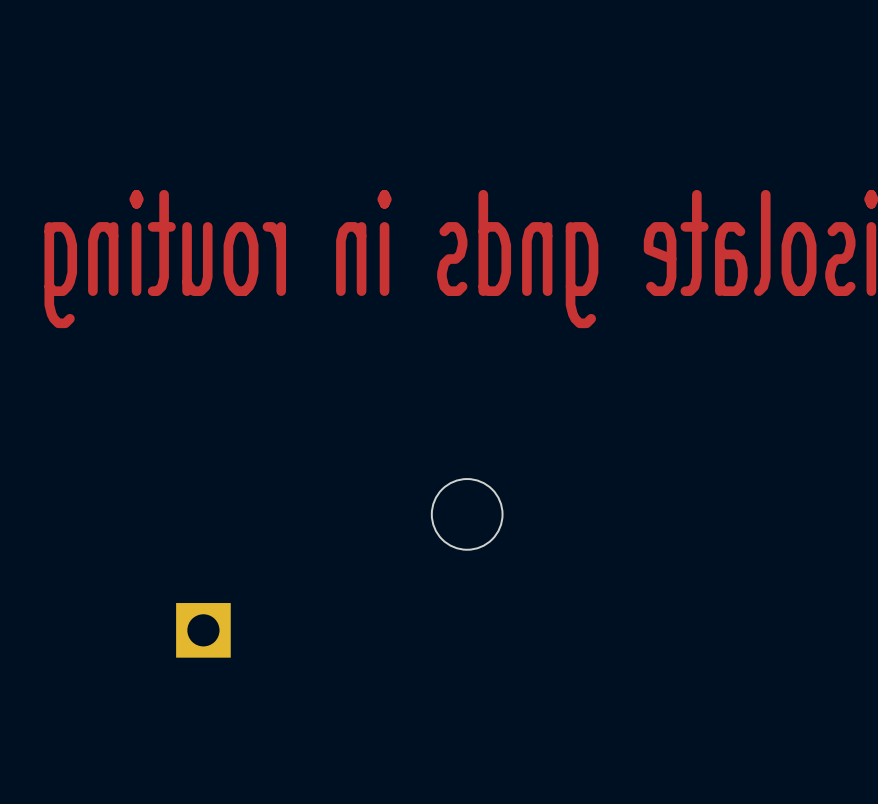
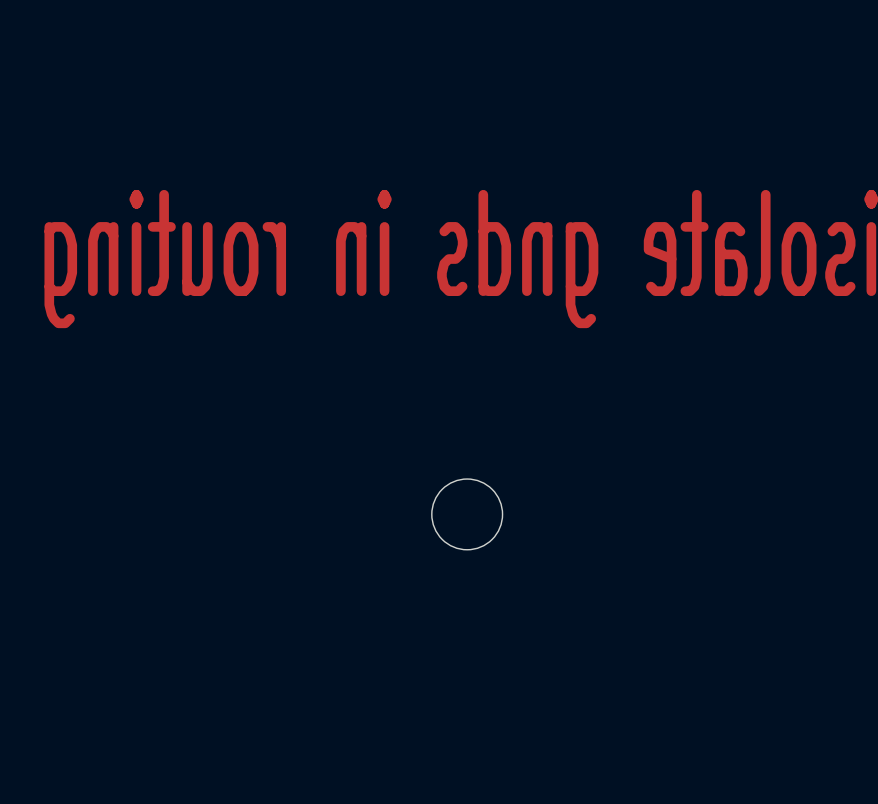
part: (203, 630) -> none

